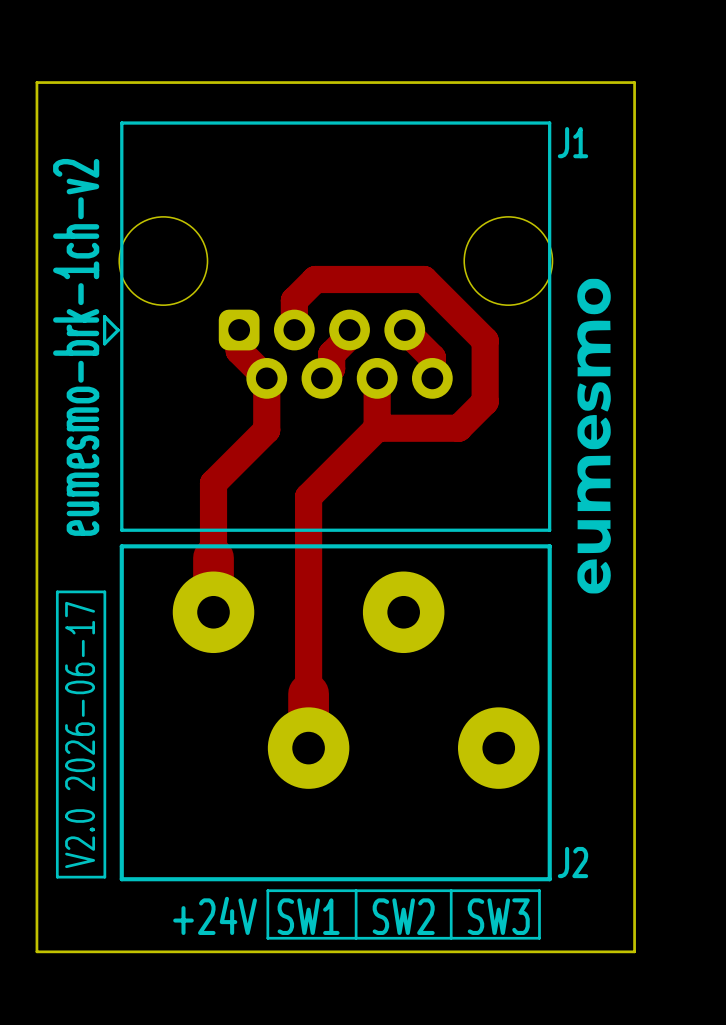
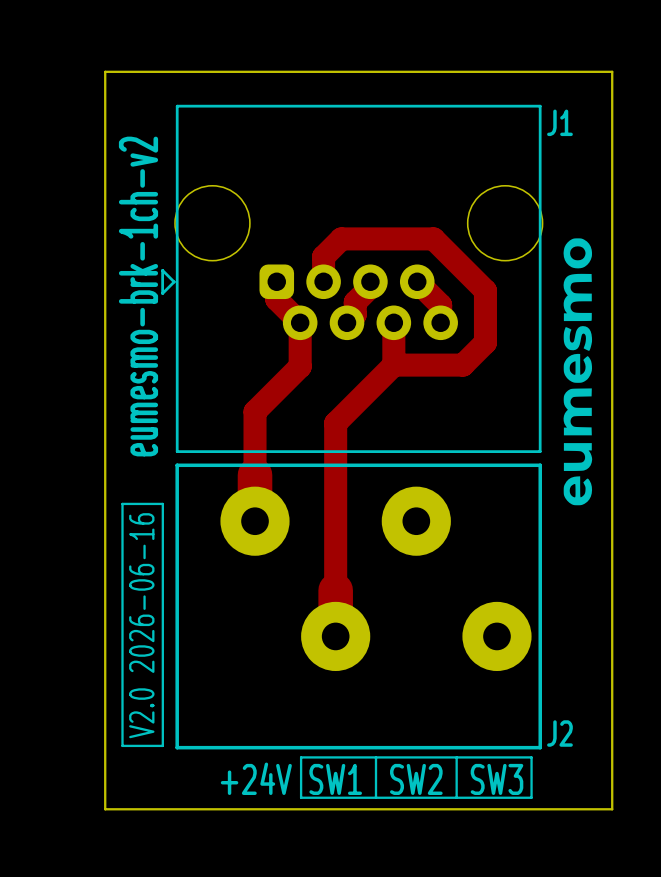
text: V2.0 2026-06-17 (80, 734) -> V2.0 2026-06-16 (141, 625)

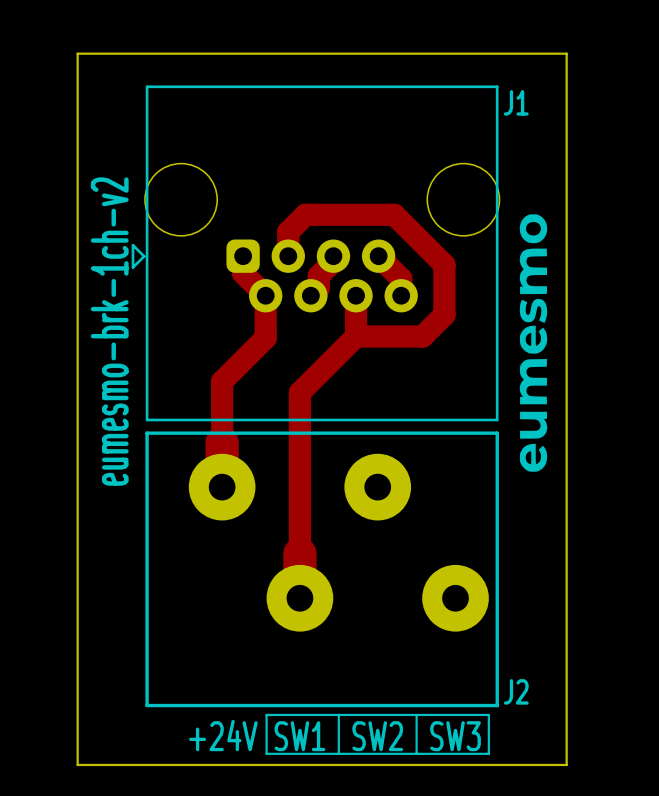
text position: eumesmo-brk-1ch-v2 (138, 296) -> eumesmo-brk-1ch-v2 (109, 331)
line: (122, 503) (162, 503) (162, 745) (122, 745) (122, 503) -> none
text: V2.0 2026-06-16 (141, 625) -> none

